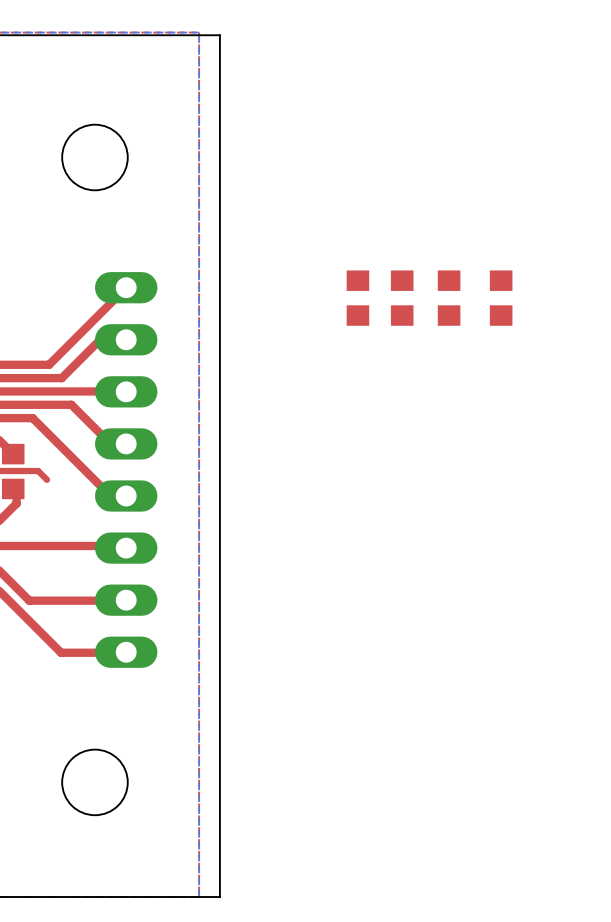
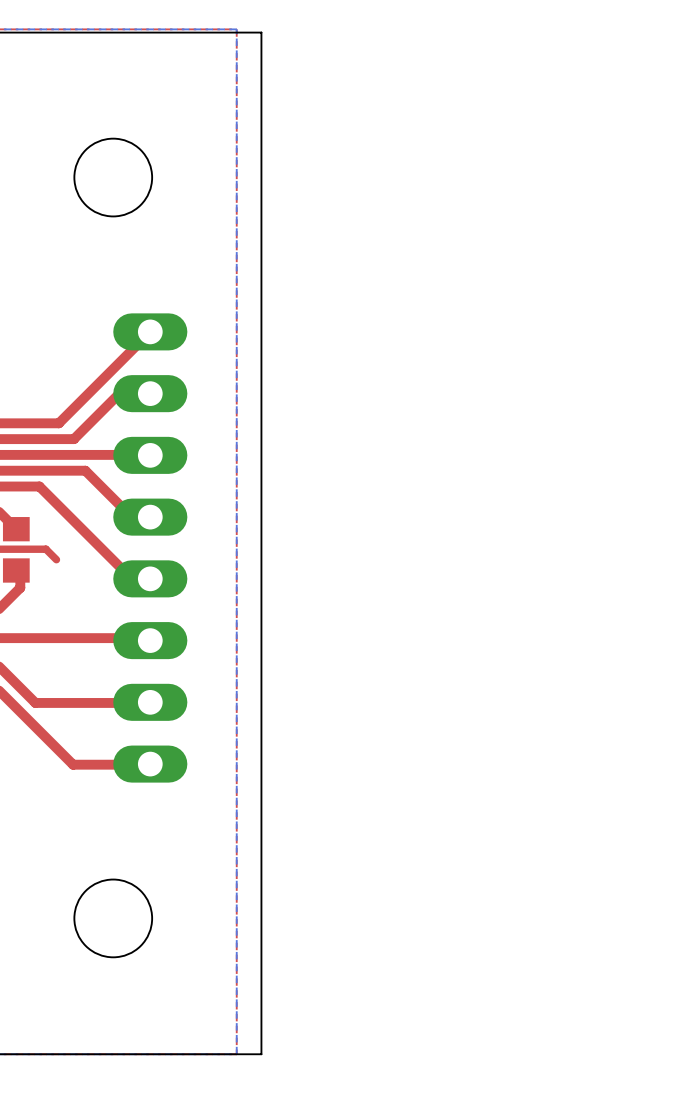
part: (357, 298) -> none
part: (402, 298) -> none
part: (449, 298) -> none
part: (501, 298) -> none

